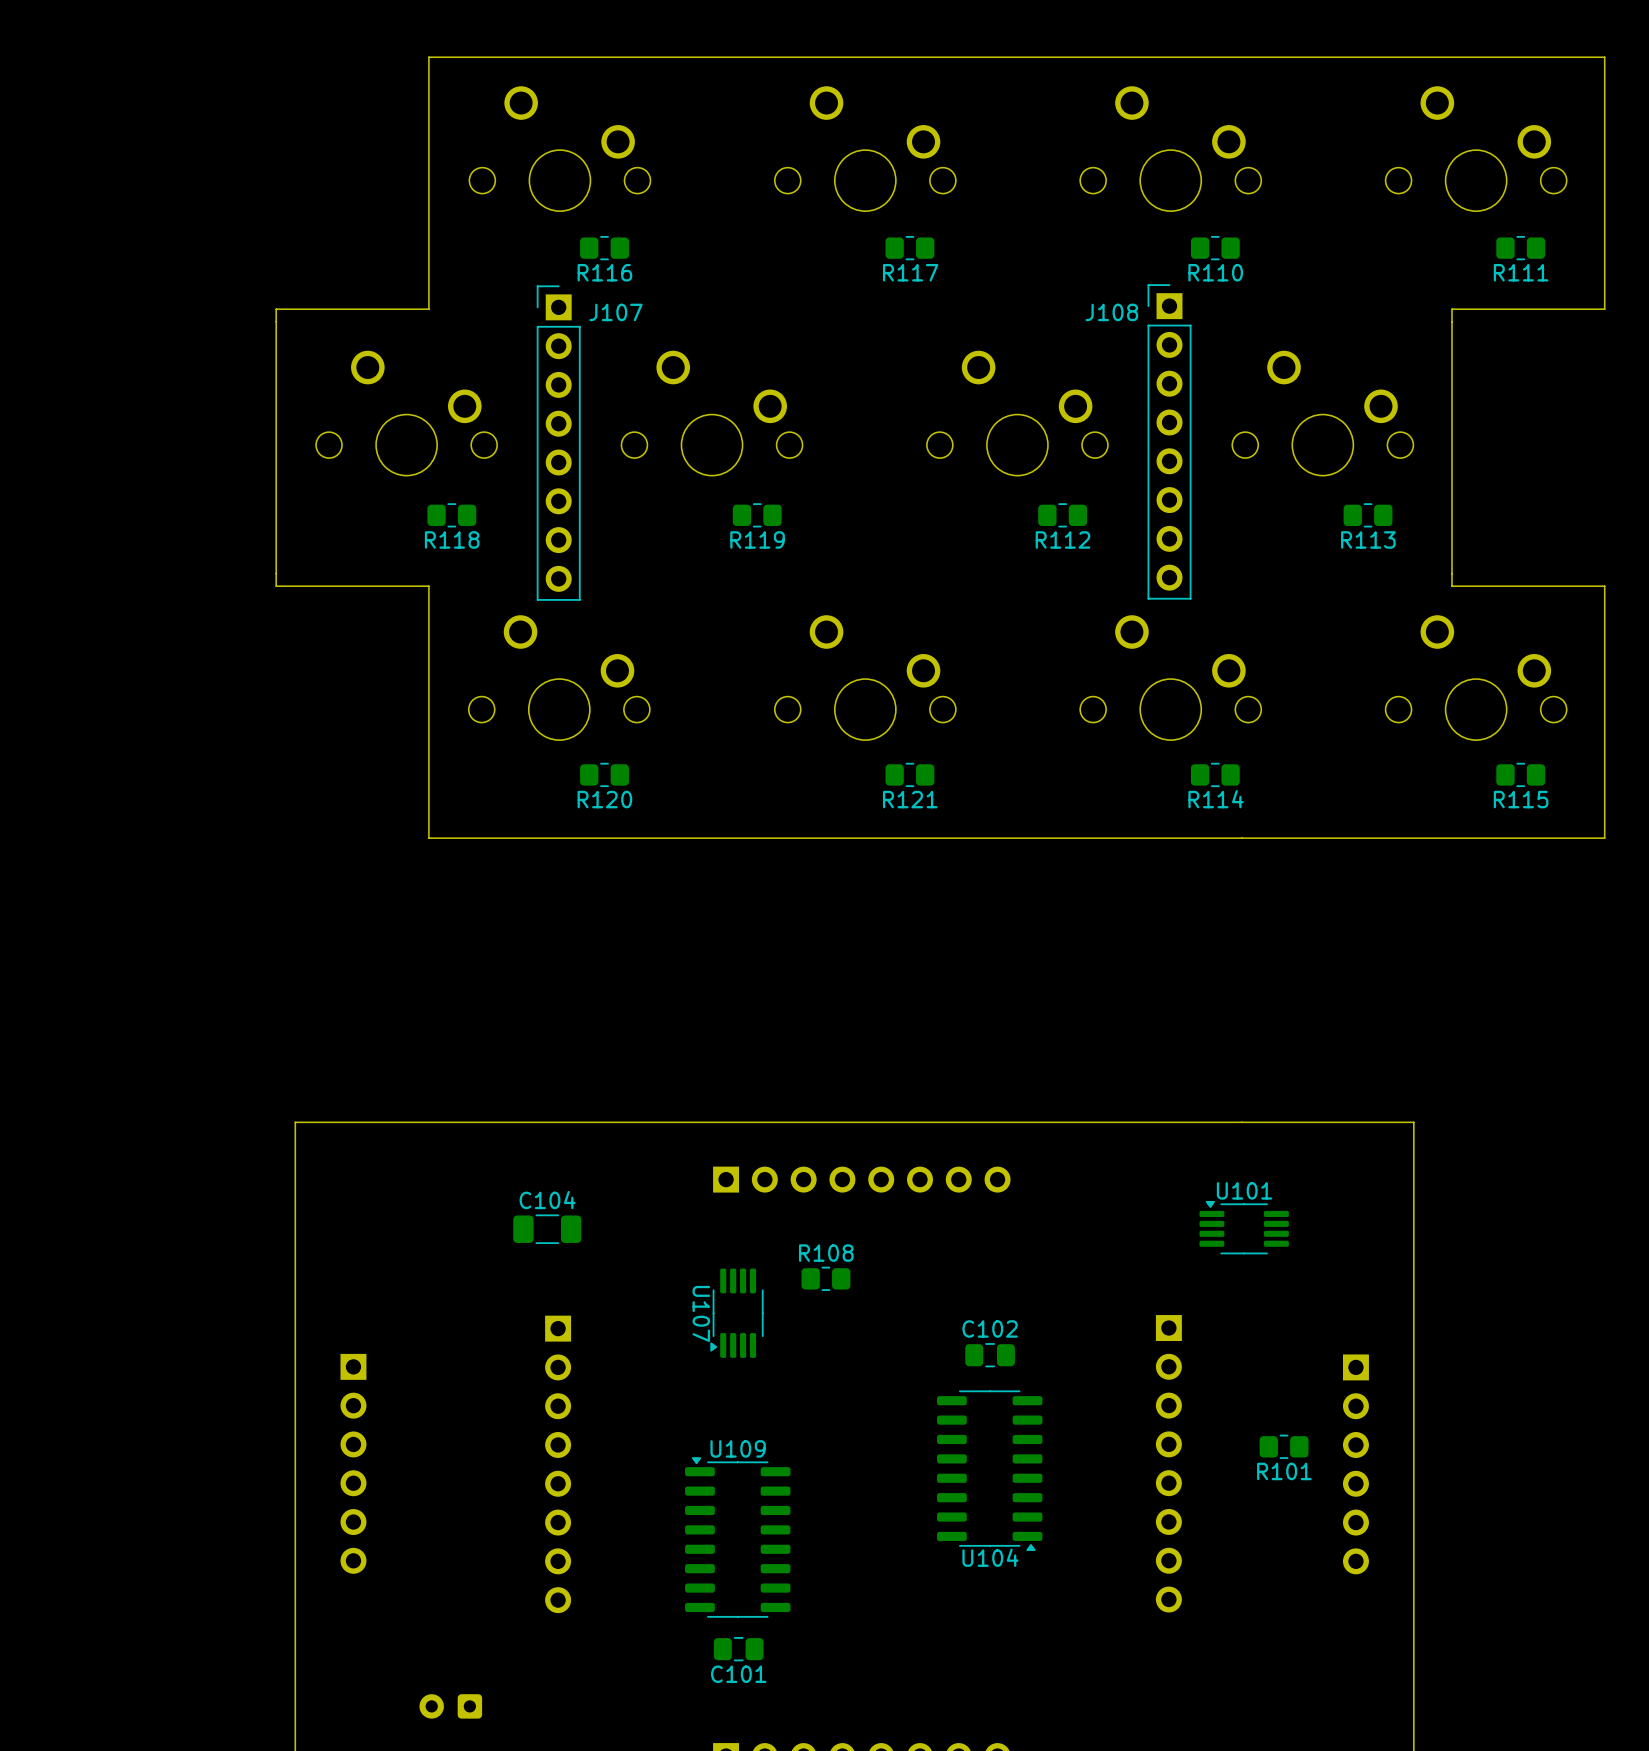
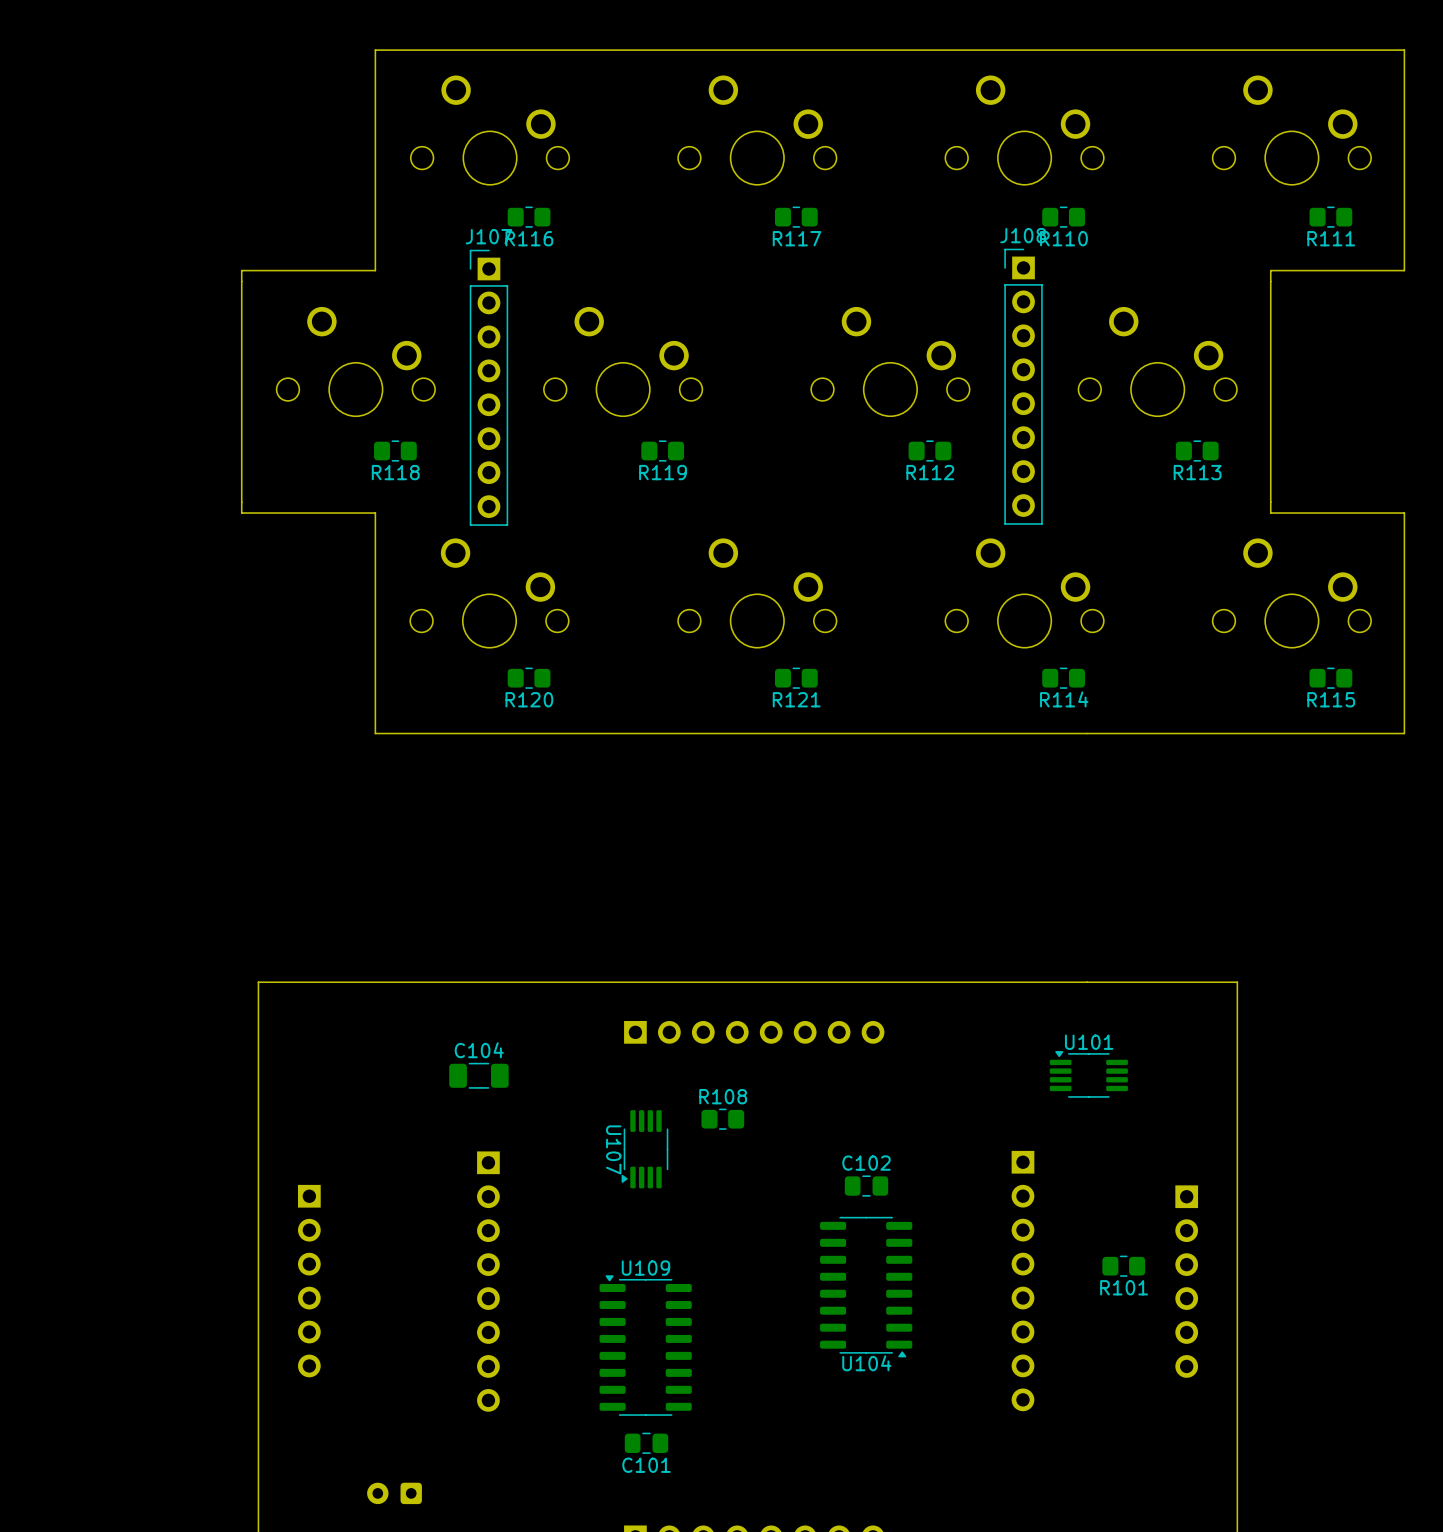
J107 name position: J107 (615, 312) -> J107 (488, 236)
J108 name position: J108 (1111, 312) -> J108 (1023, 235)

